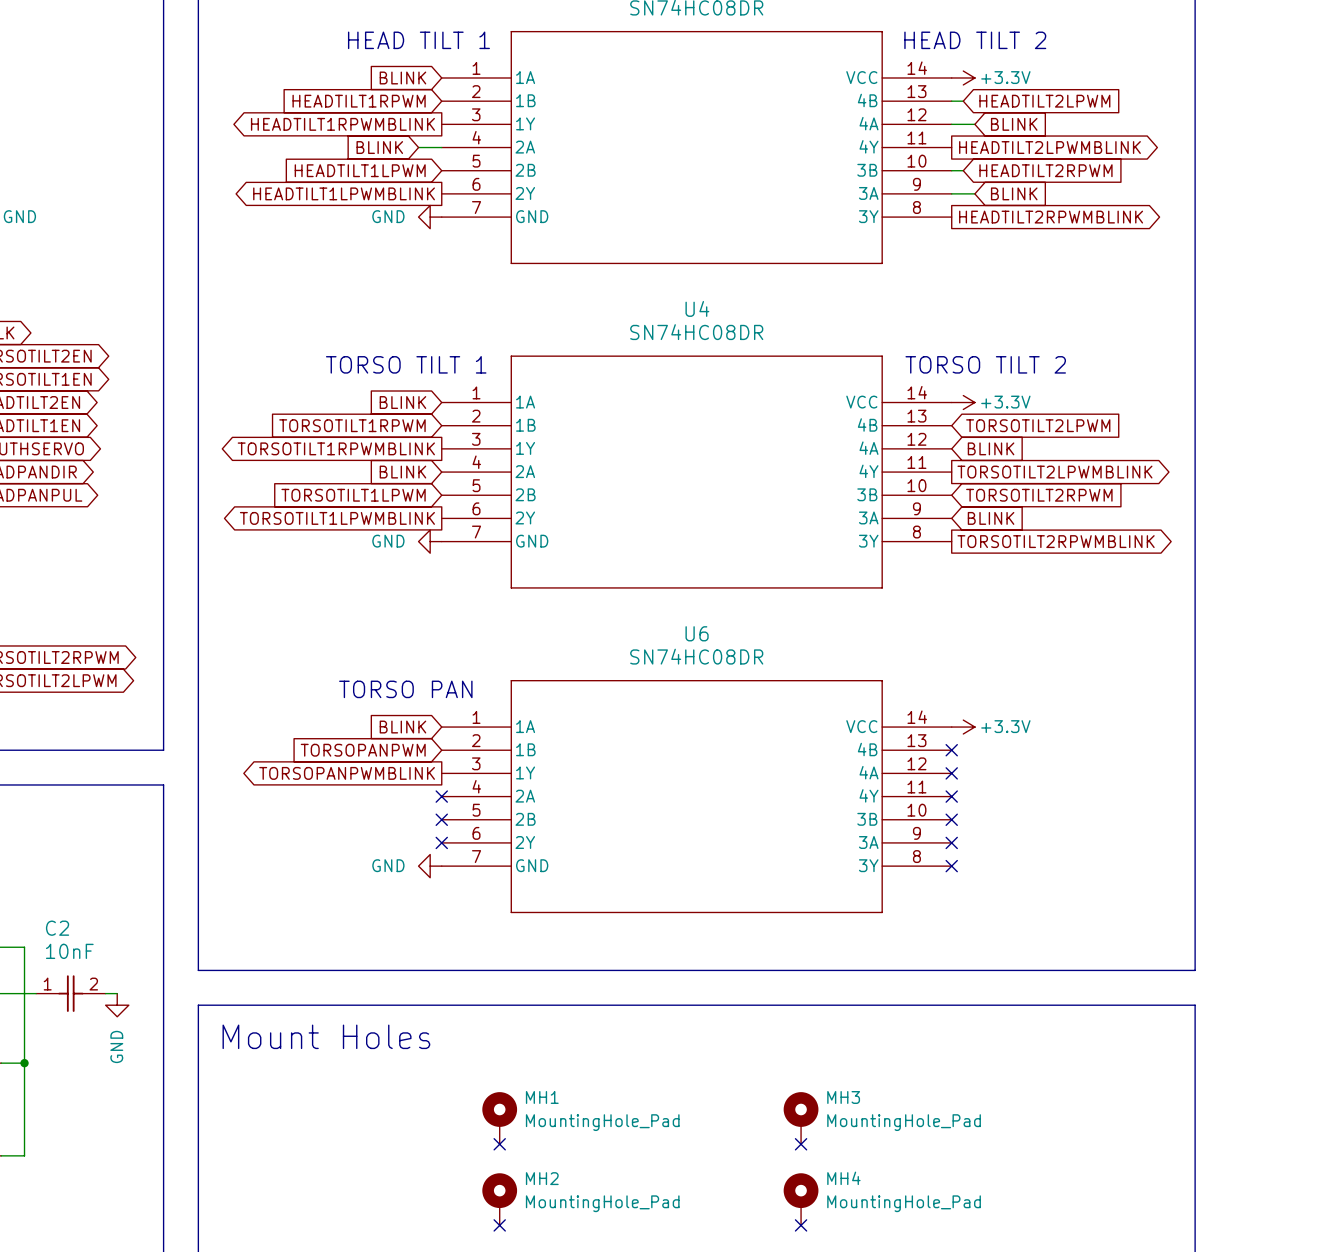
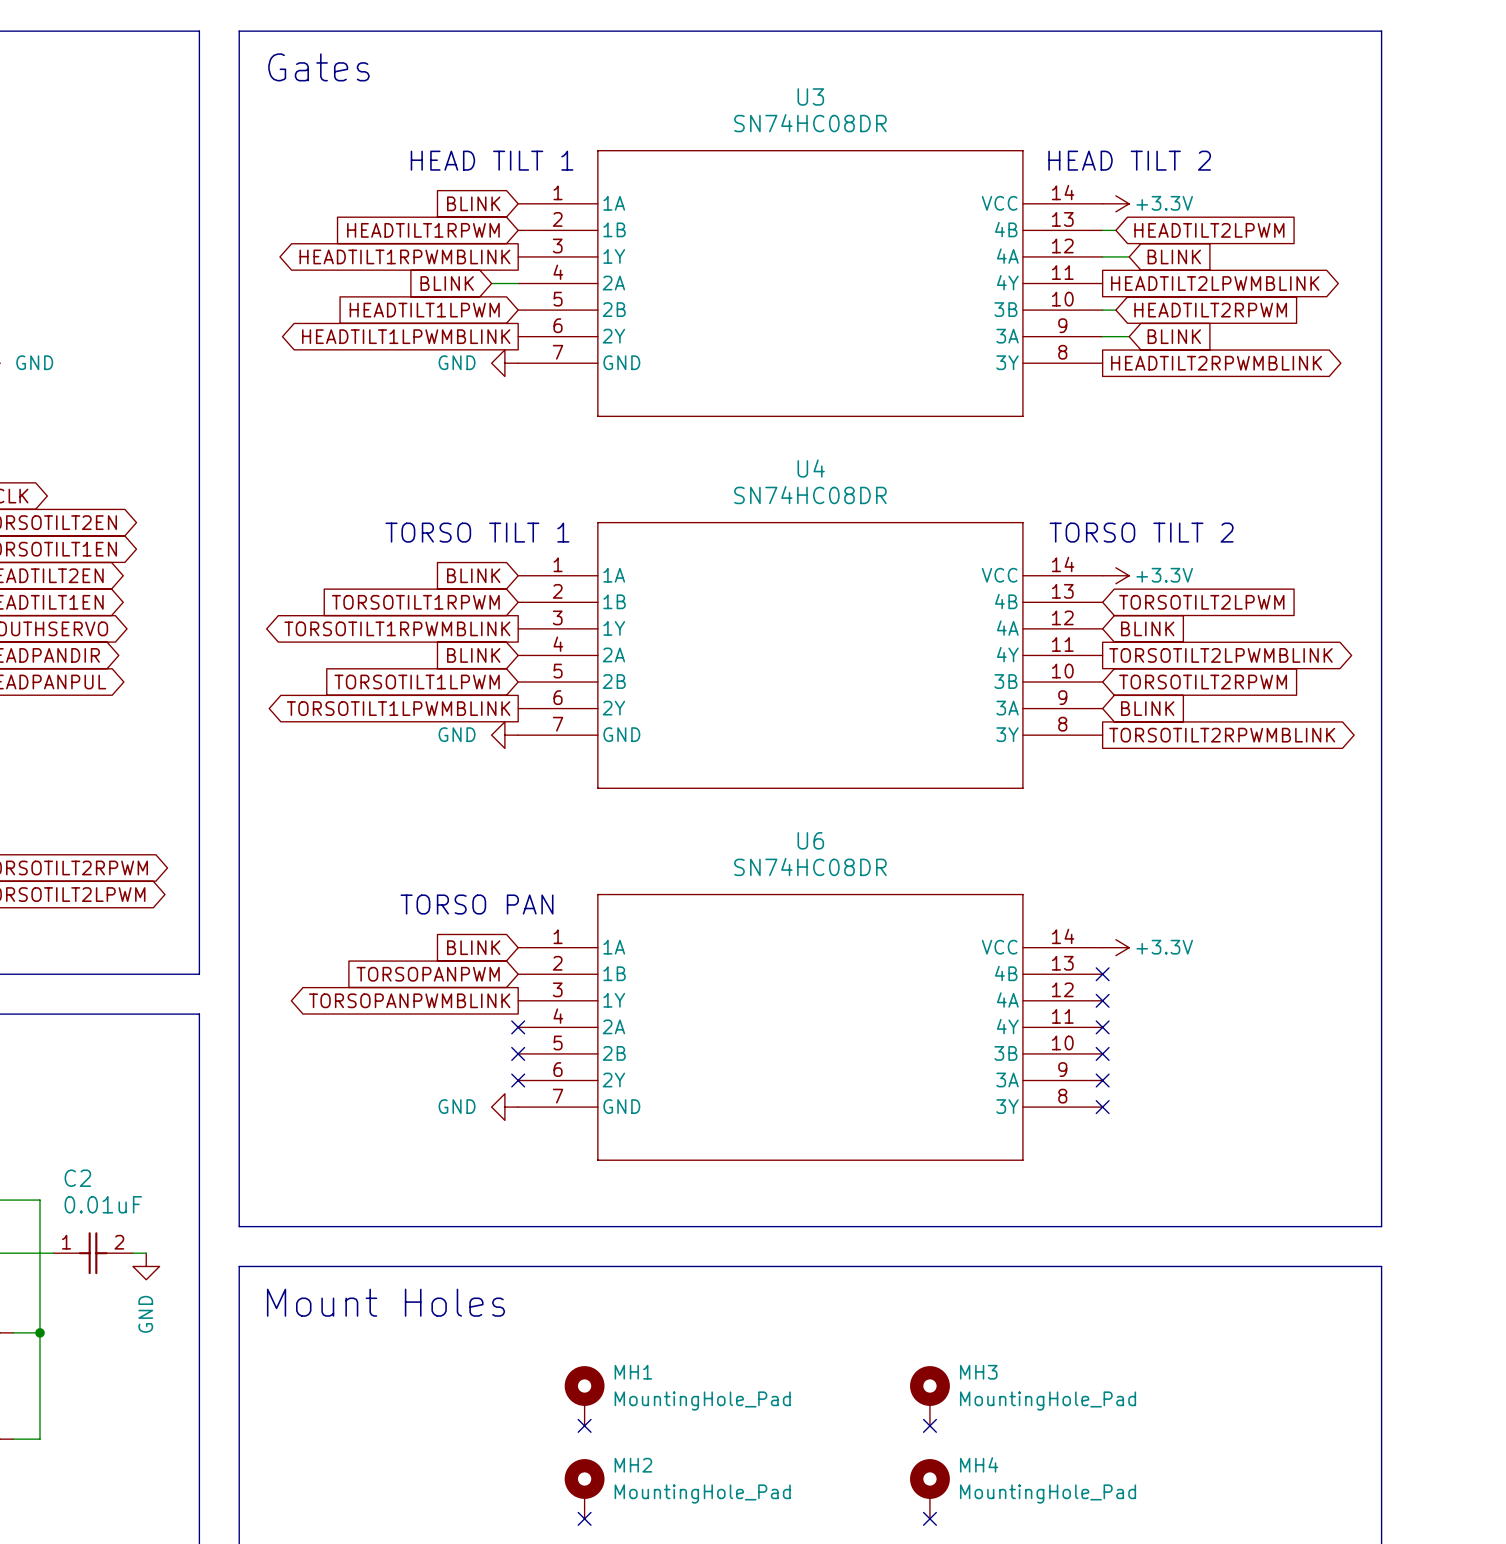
C2 value: 10nF (69, 951) -> 0.01uF (103, 1204)

